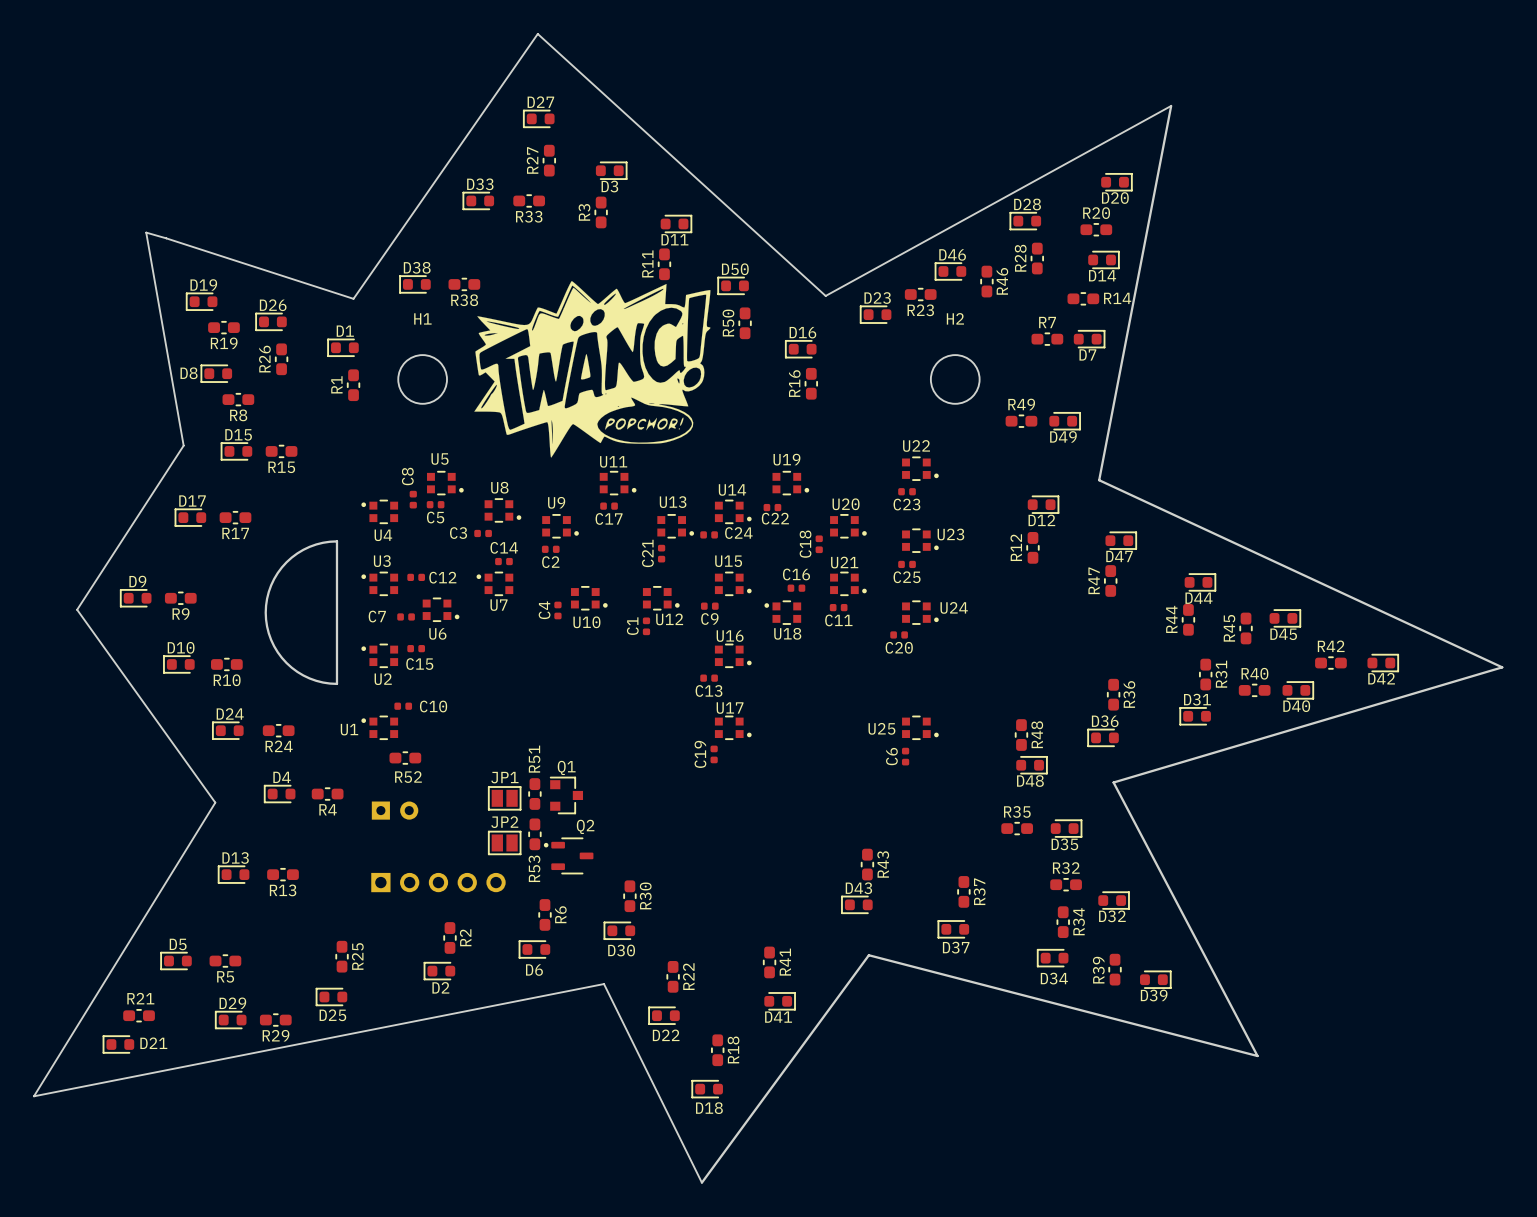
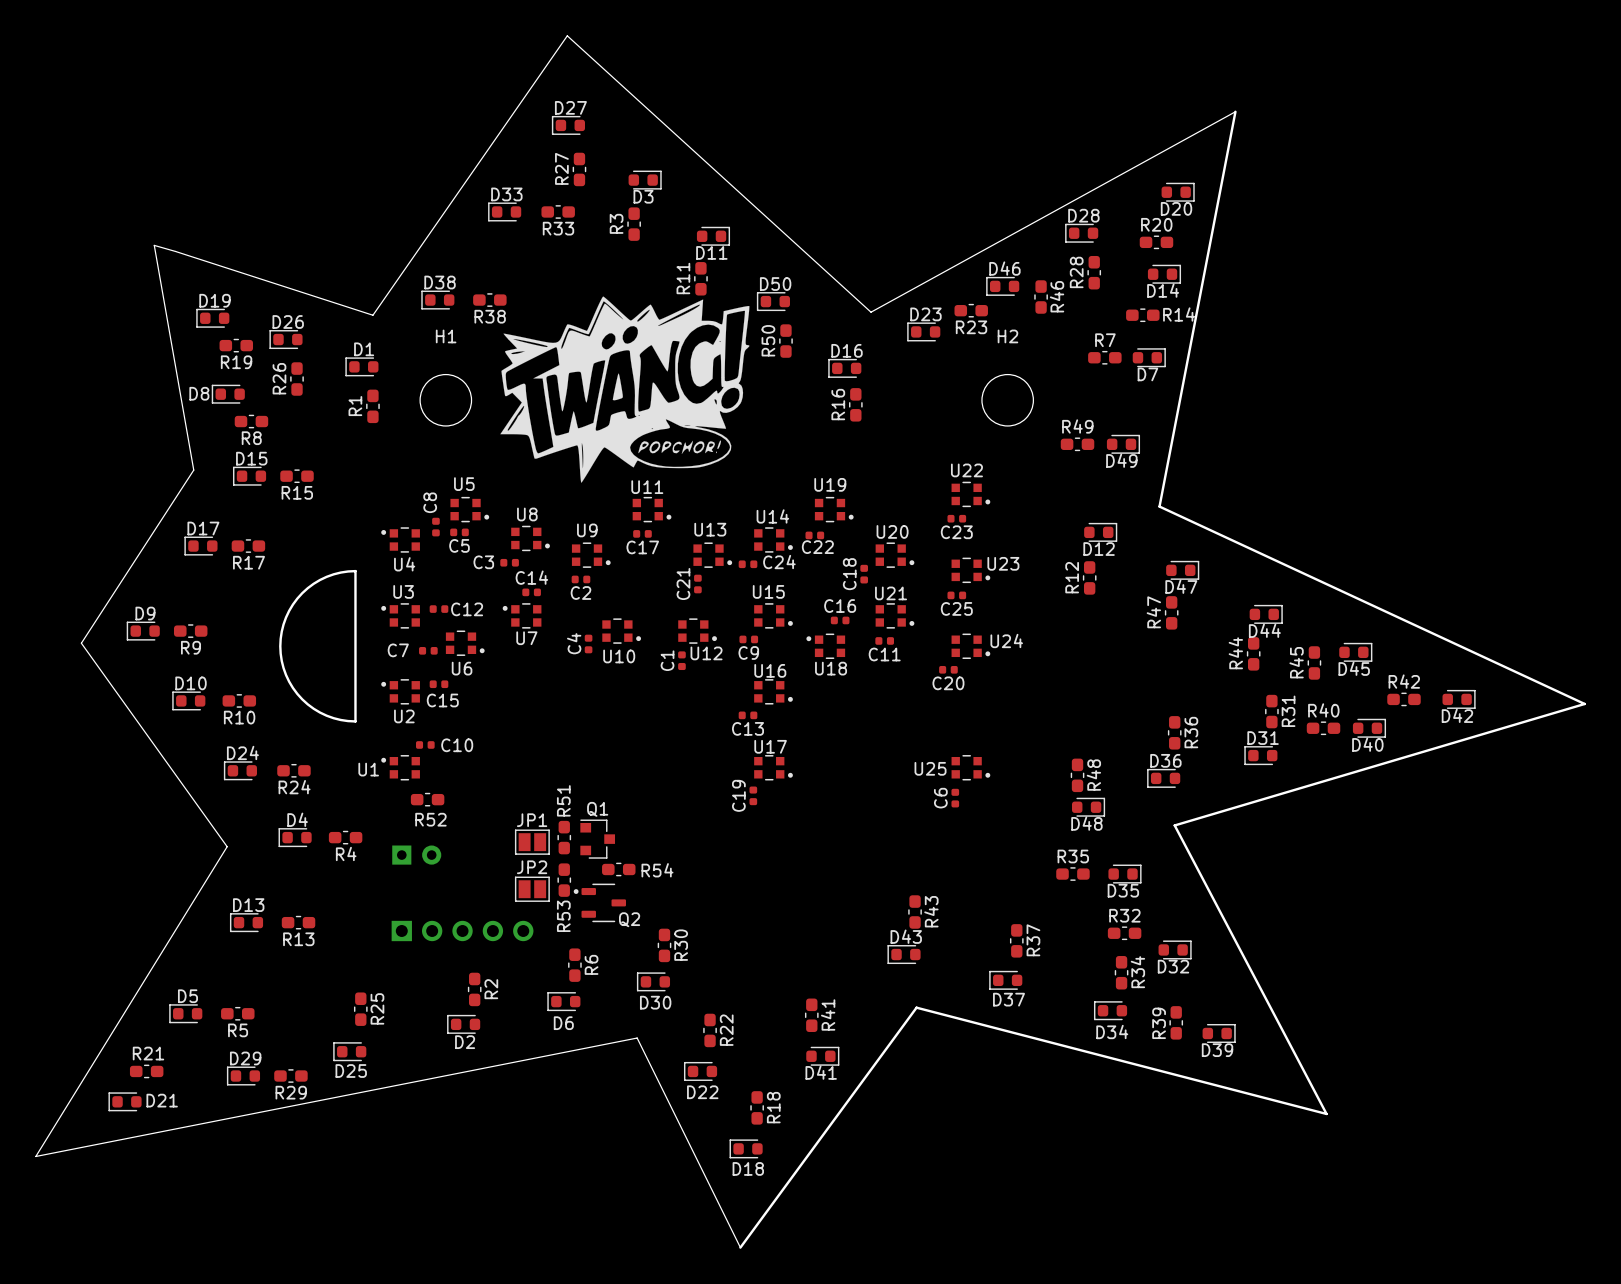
R54: none -> (618, 869)
Q2 name position: Q2 (585, 826) -> Q2 (629, 919)

